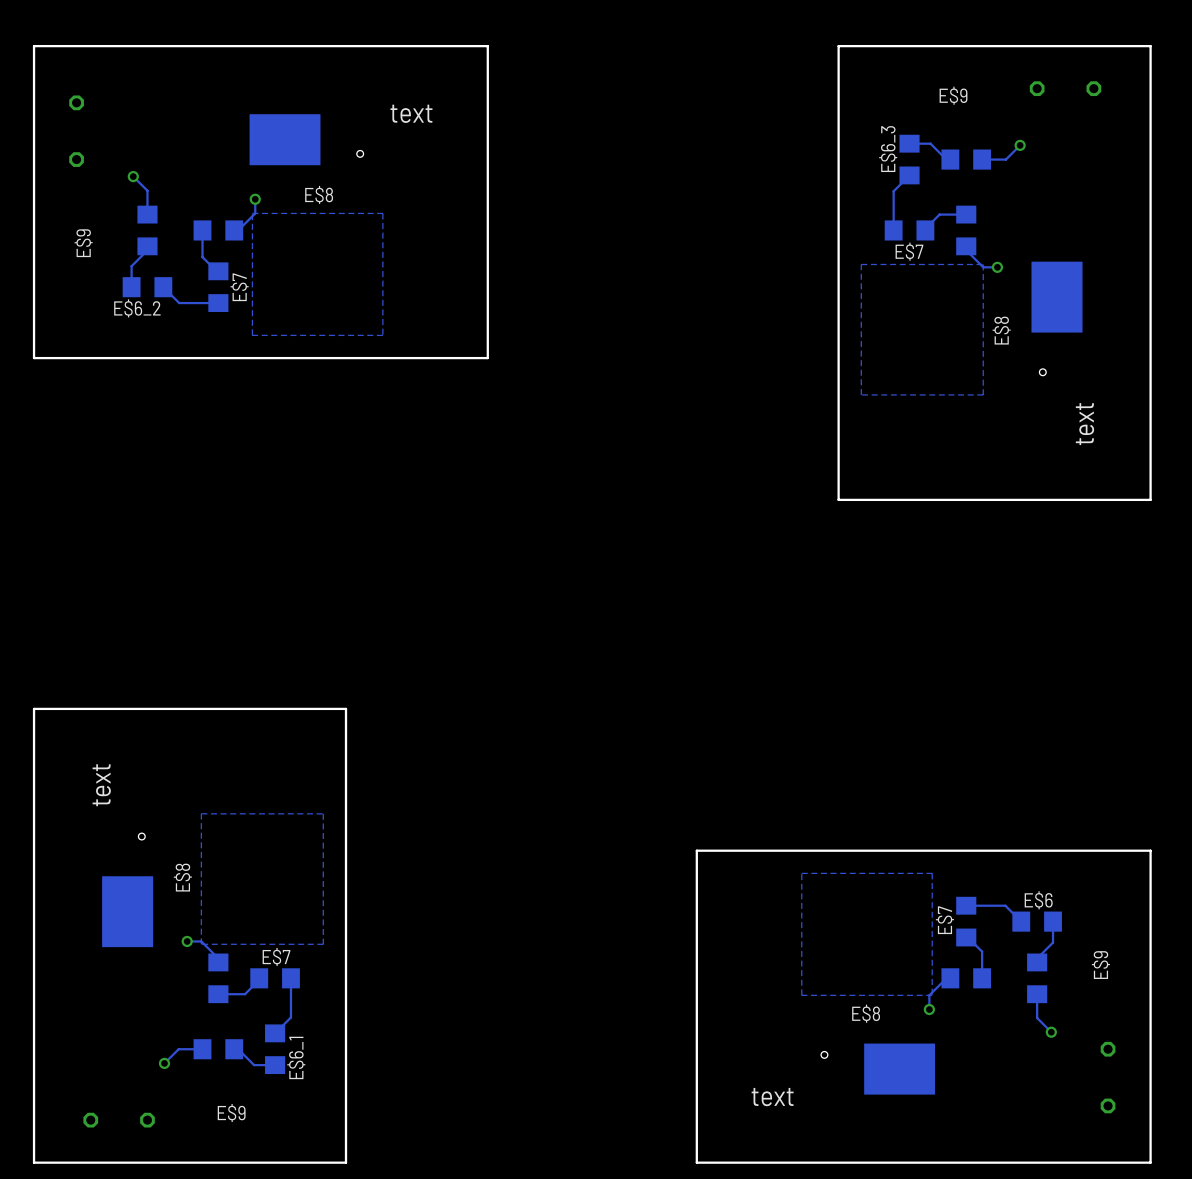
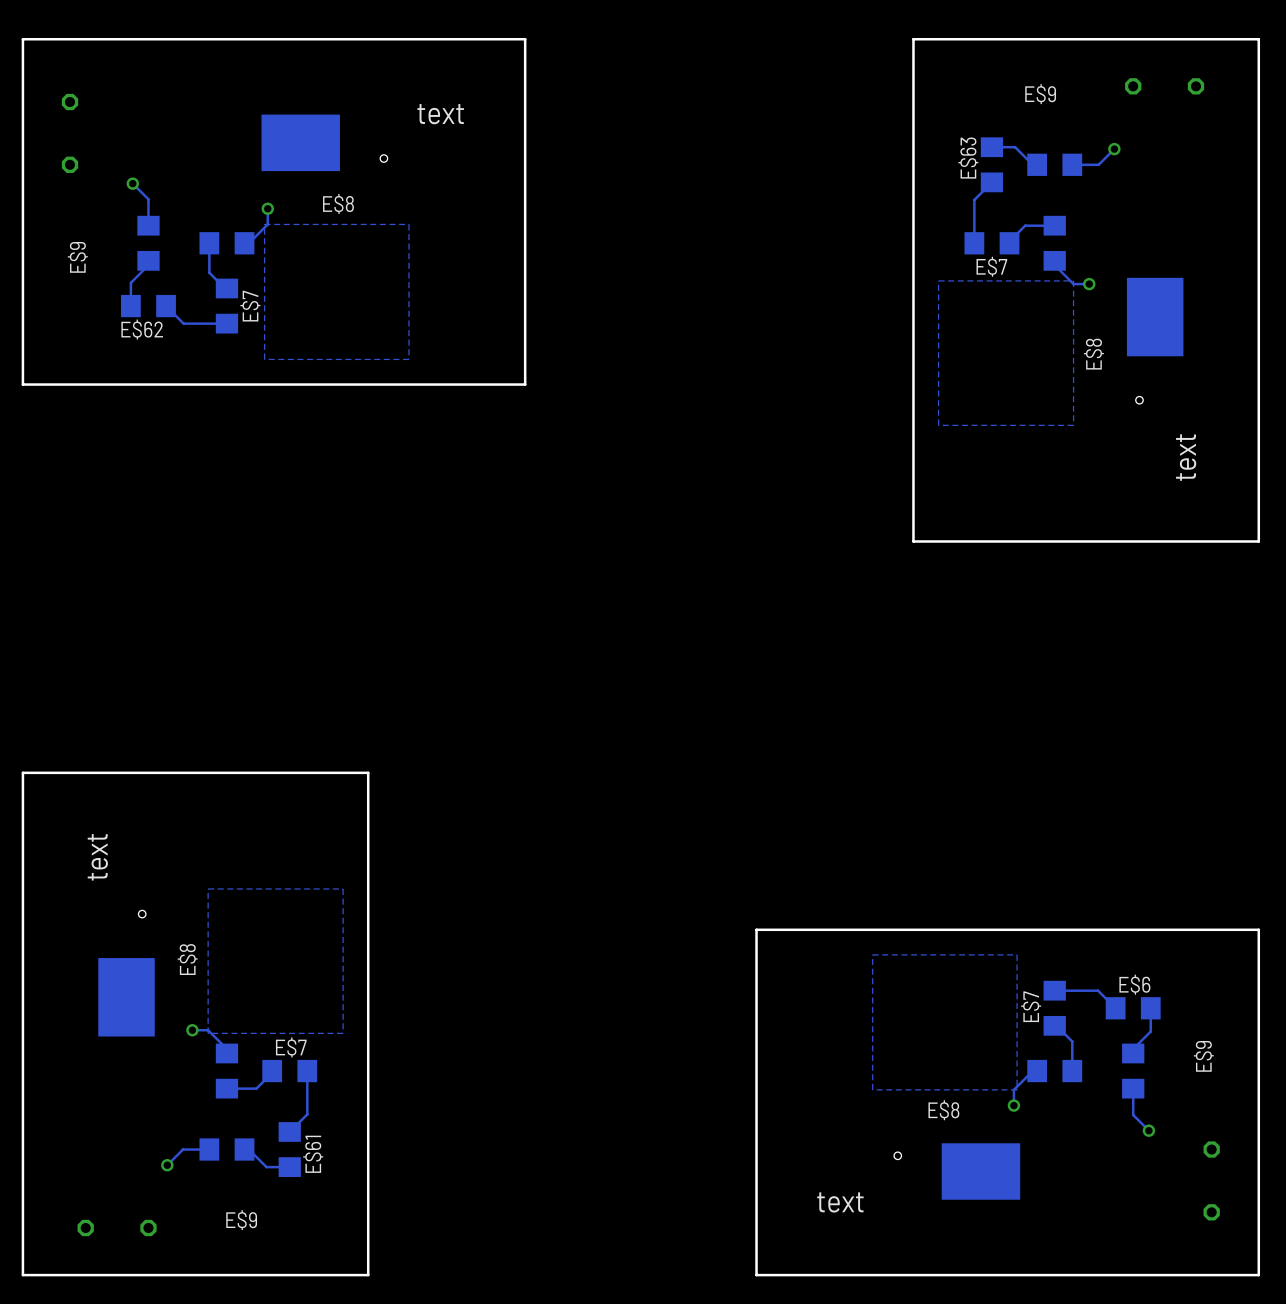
E$6_3 name: E$6_3 (888, 149) -> E$63 (968, 158)
E$6_2 name: E$6_2 (137, 308) -> E$62 (142, 329)
E$6_1 name: E$6_1 (296, 1057) -> E$61 (313, 1154)

